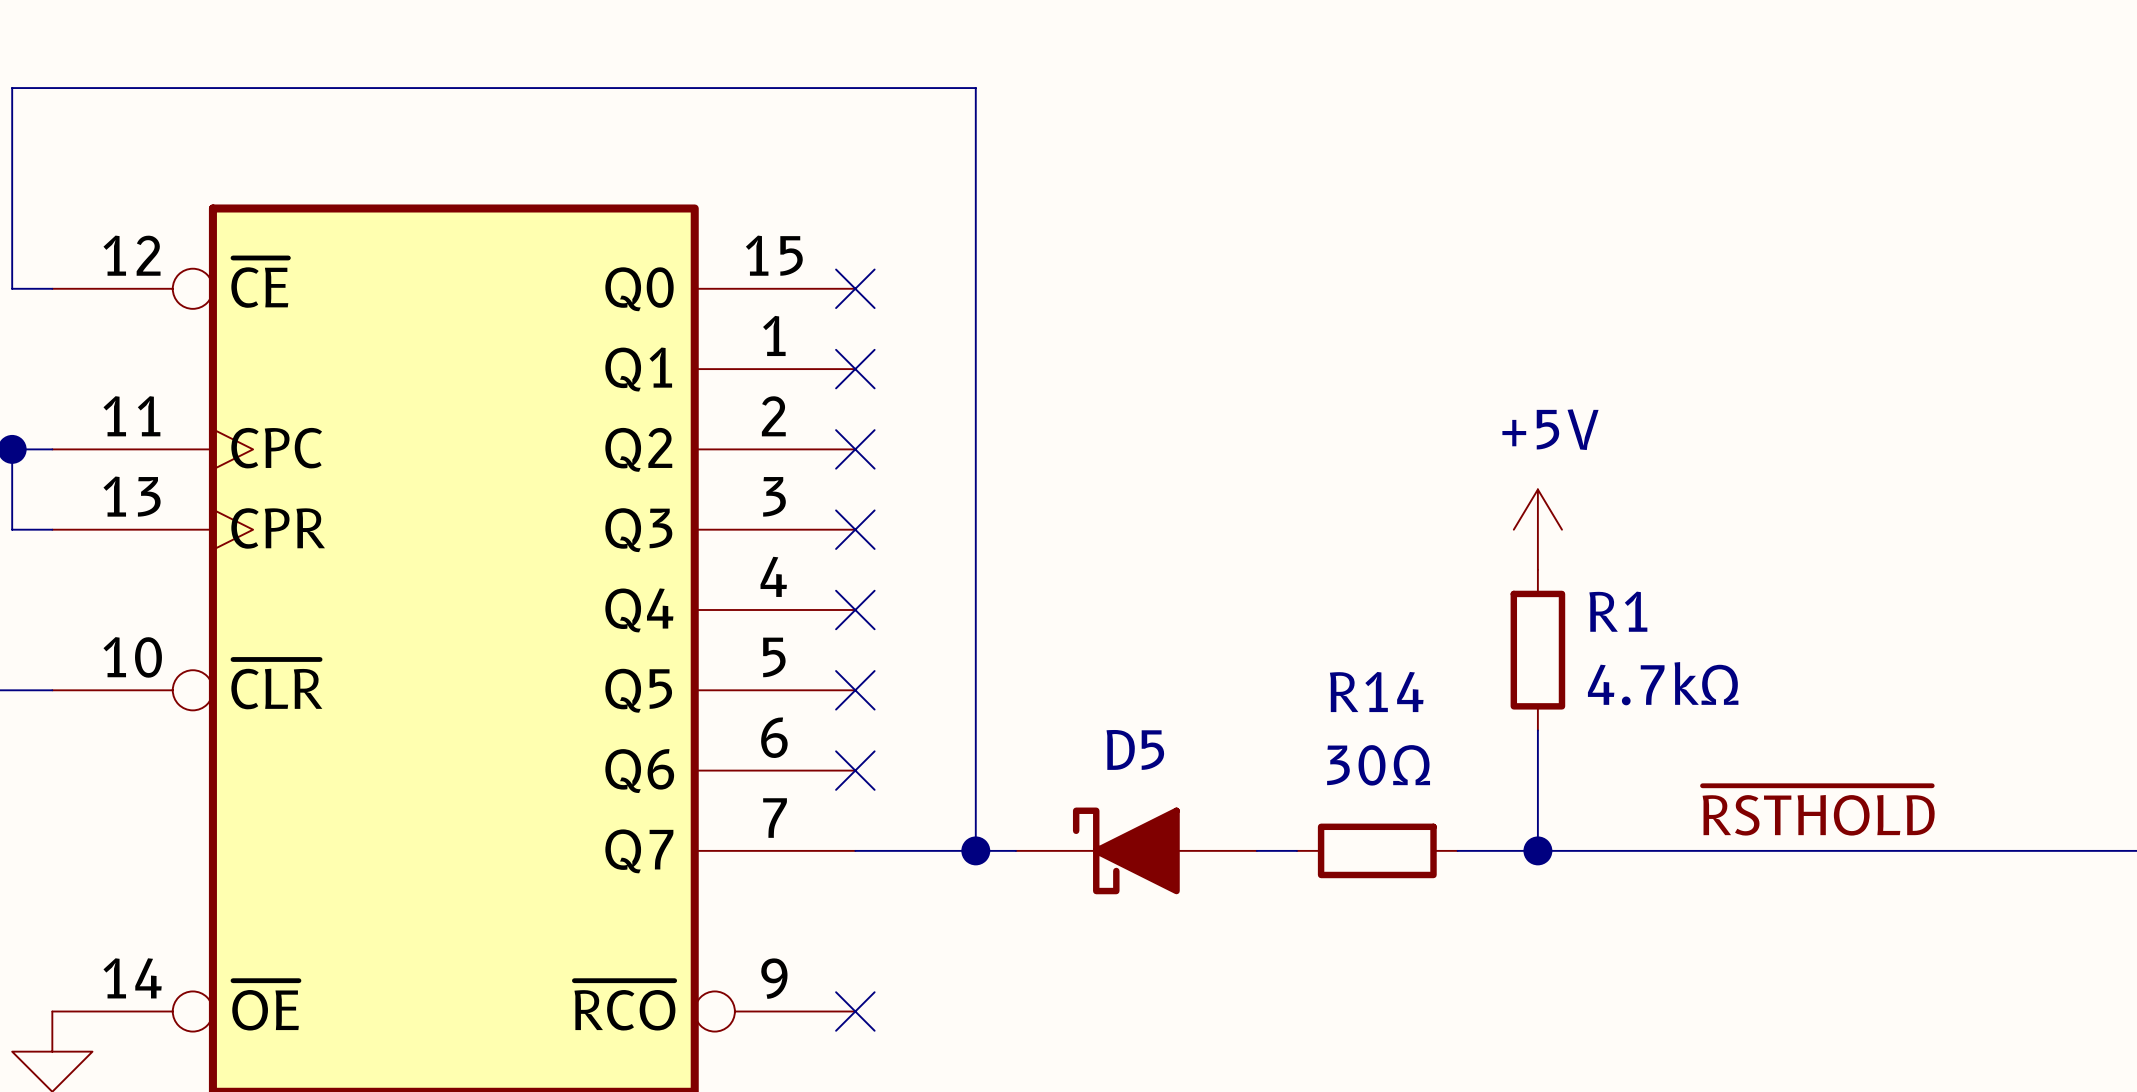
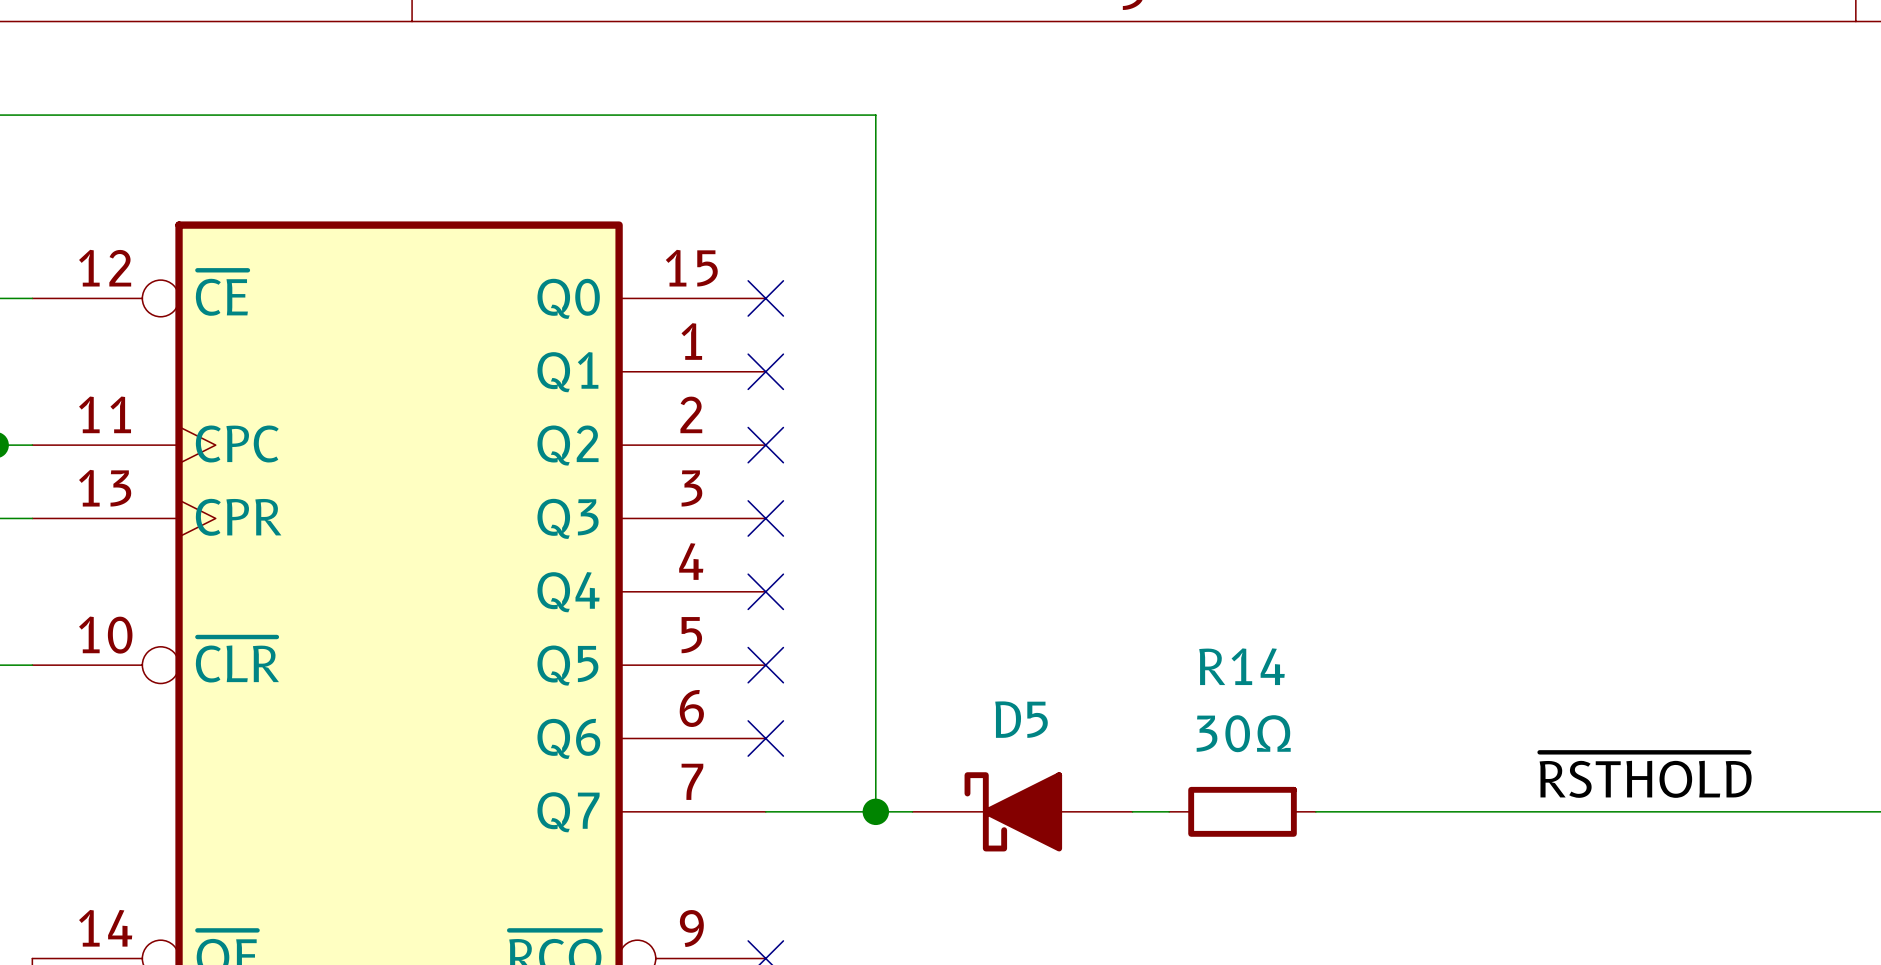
power symbol: +5V (1537, 529) -> none
R1: 4.7kΩ (1537, 650) -> none
wire: (1537, 730) (1537, 850) -> none
junction: (1537, 850) -> none

